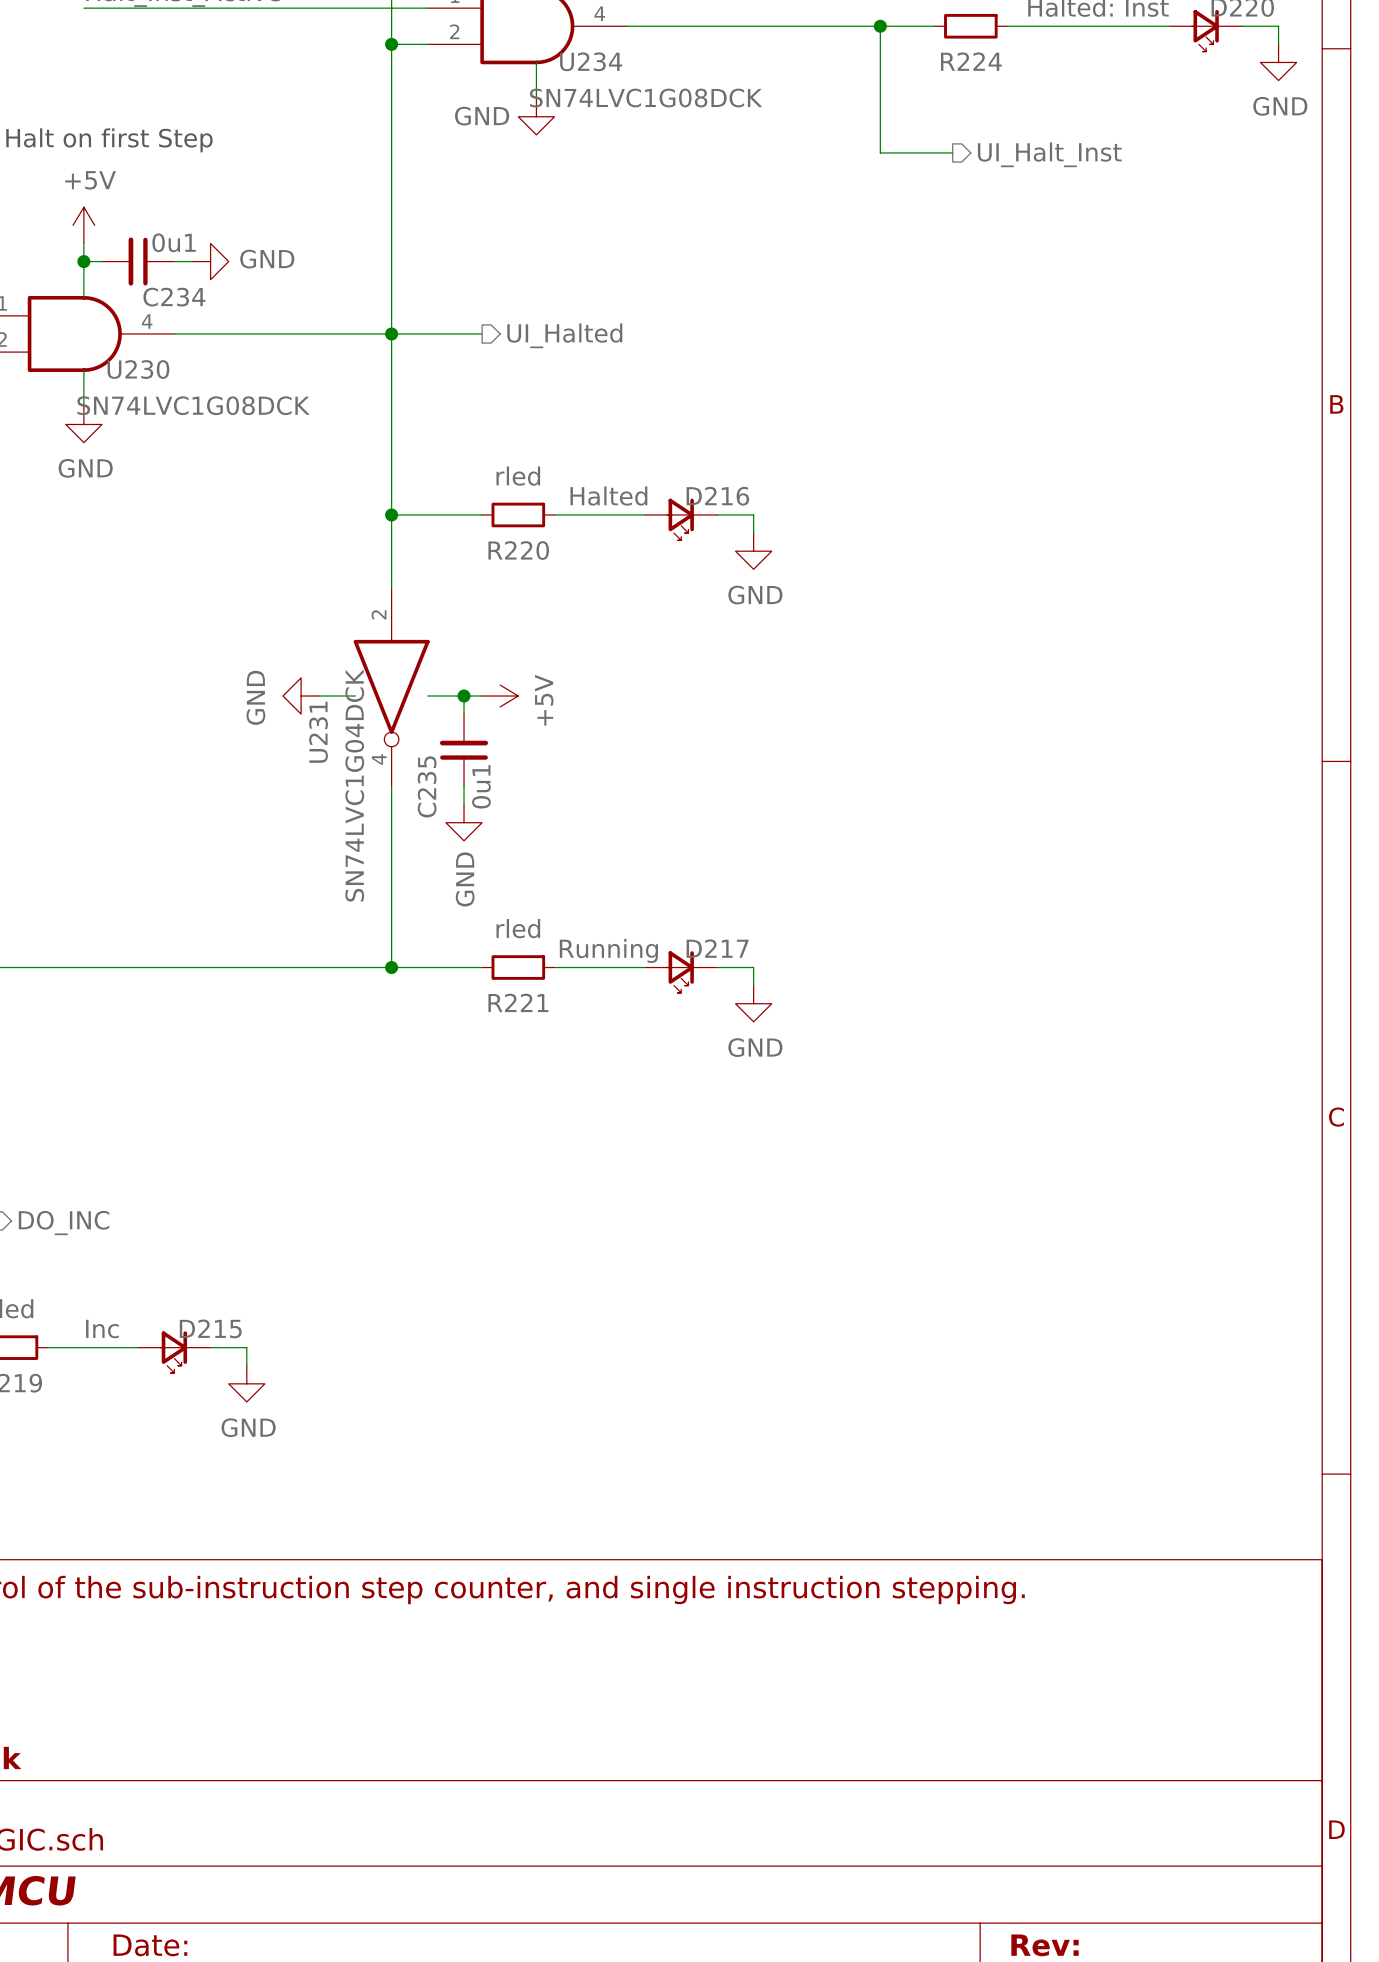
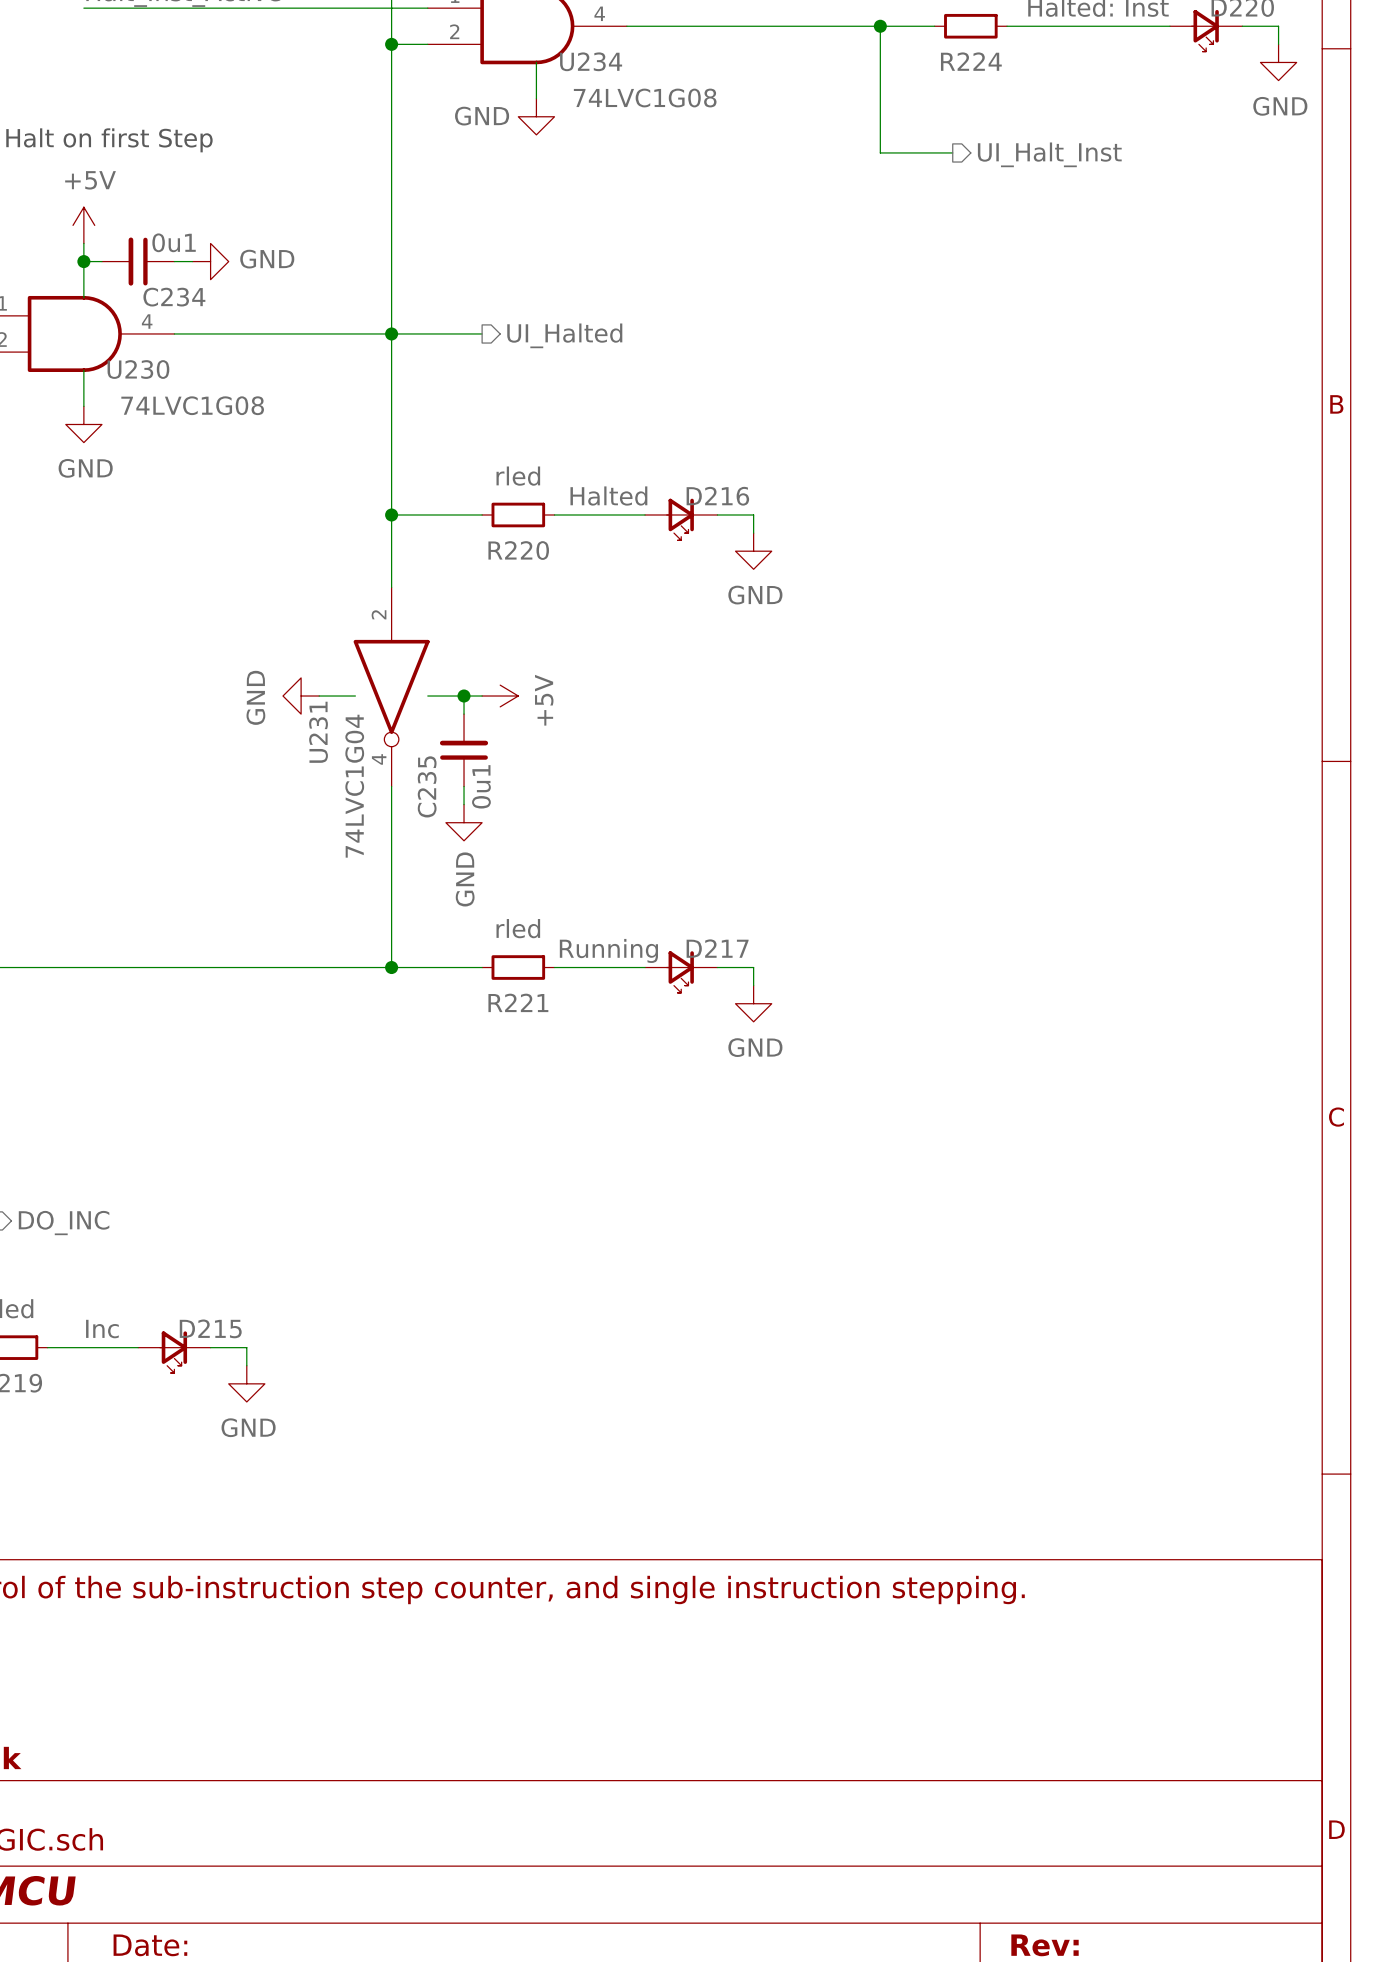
U234 value: SN74LVC1G08DCK (646, 98) -> 74LVC1G08 (645, 98)
U230 value: SN74LVC1G08DCK (193, 405) -> 74LVC1G08 (192, 405)
U231 value: SN74LVC1G04DCK (354, 785) -> 74LVC1G04 (354, 786)

